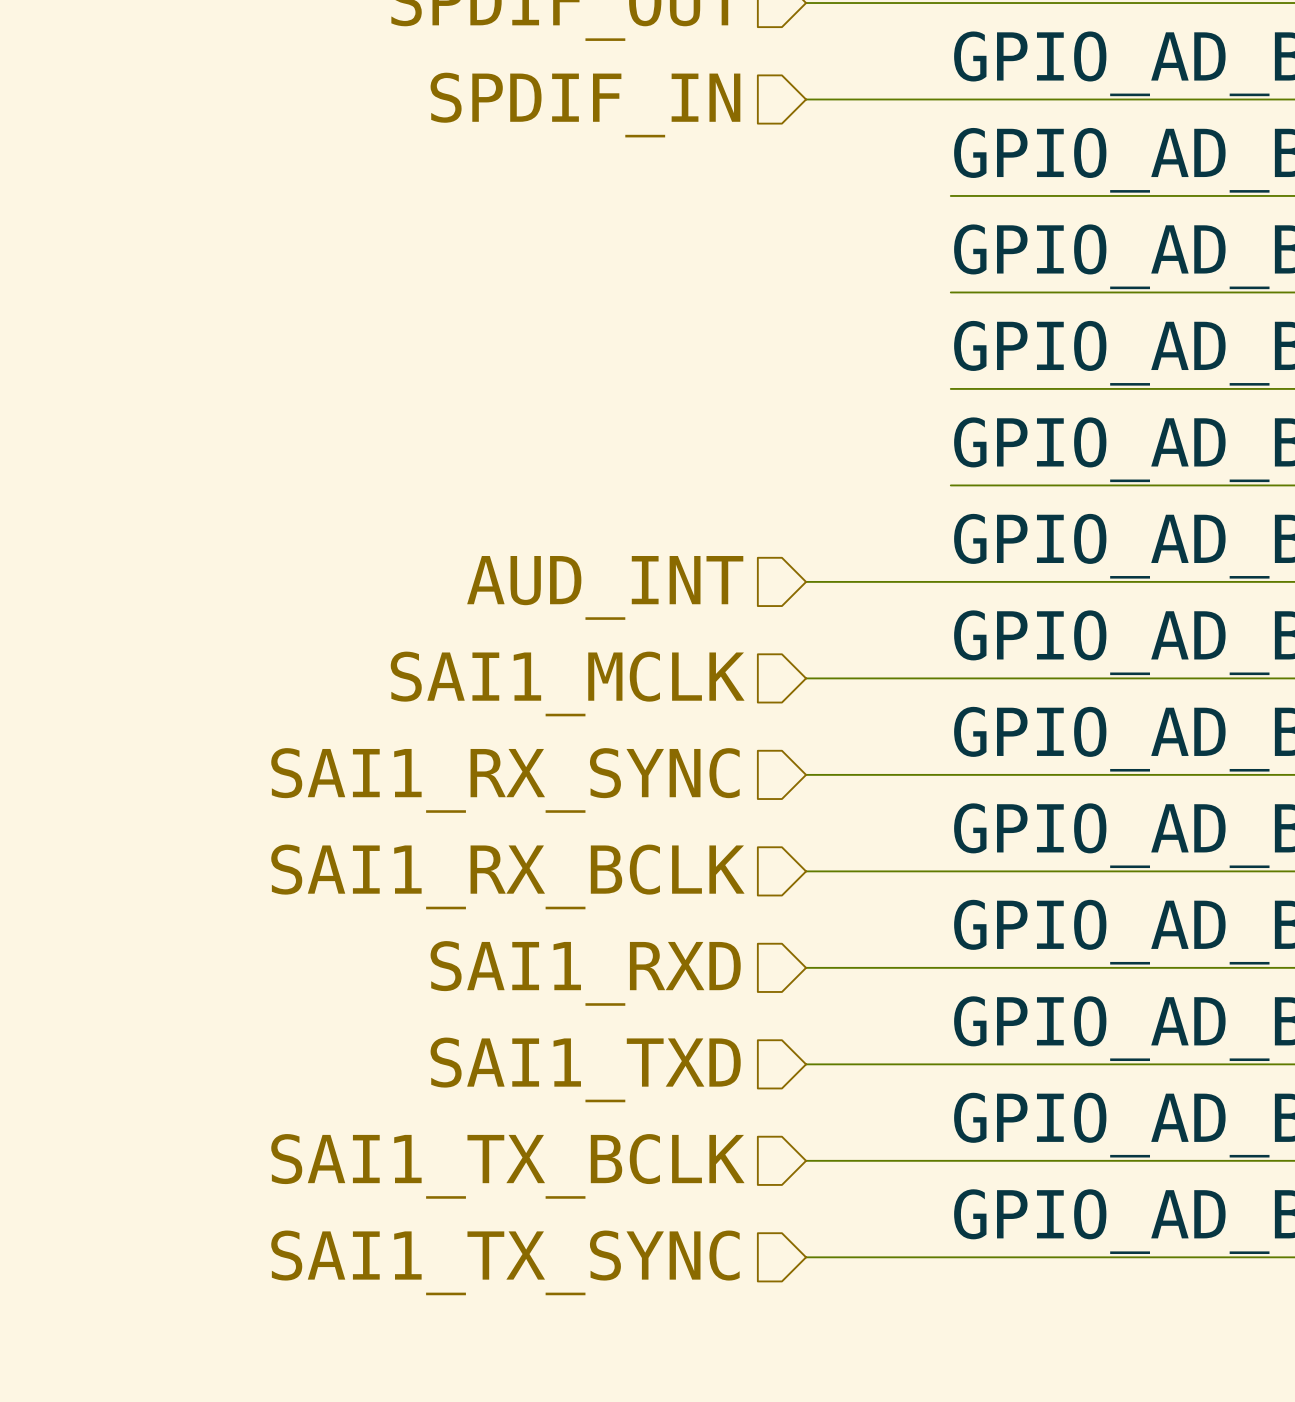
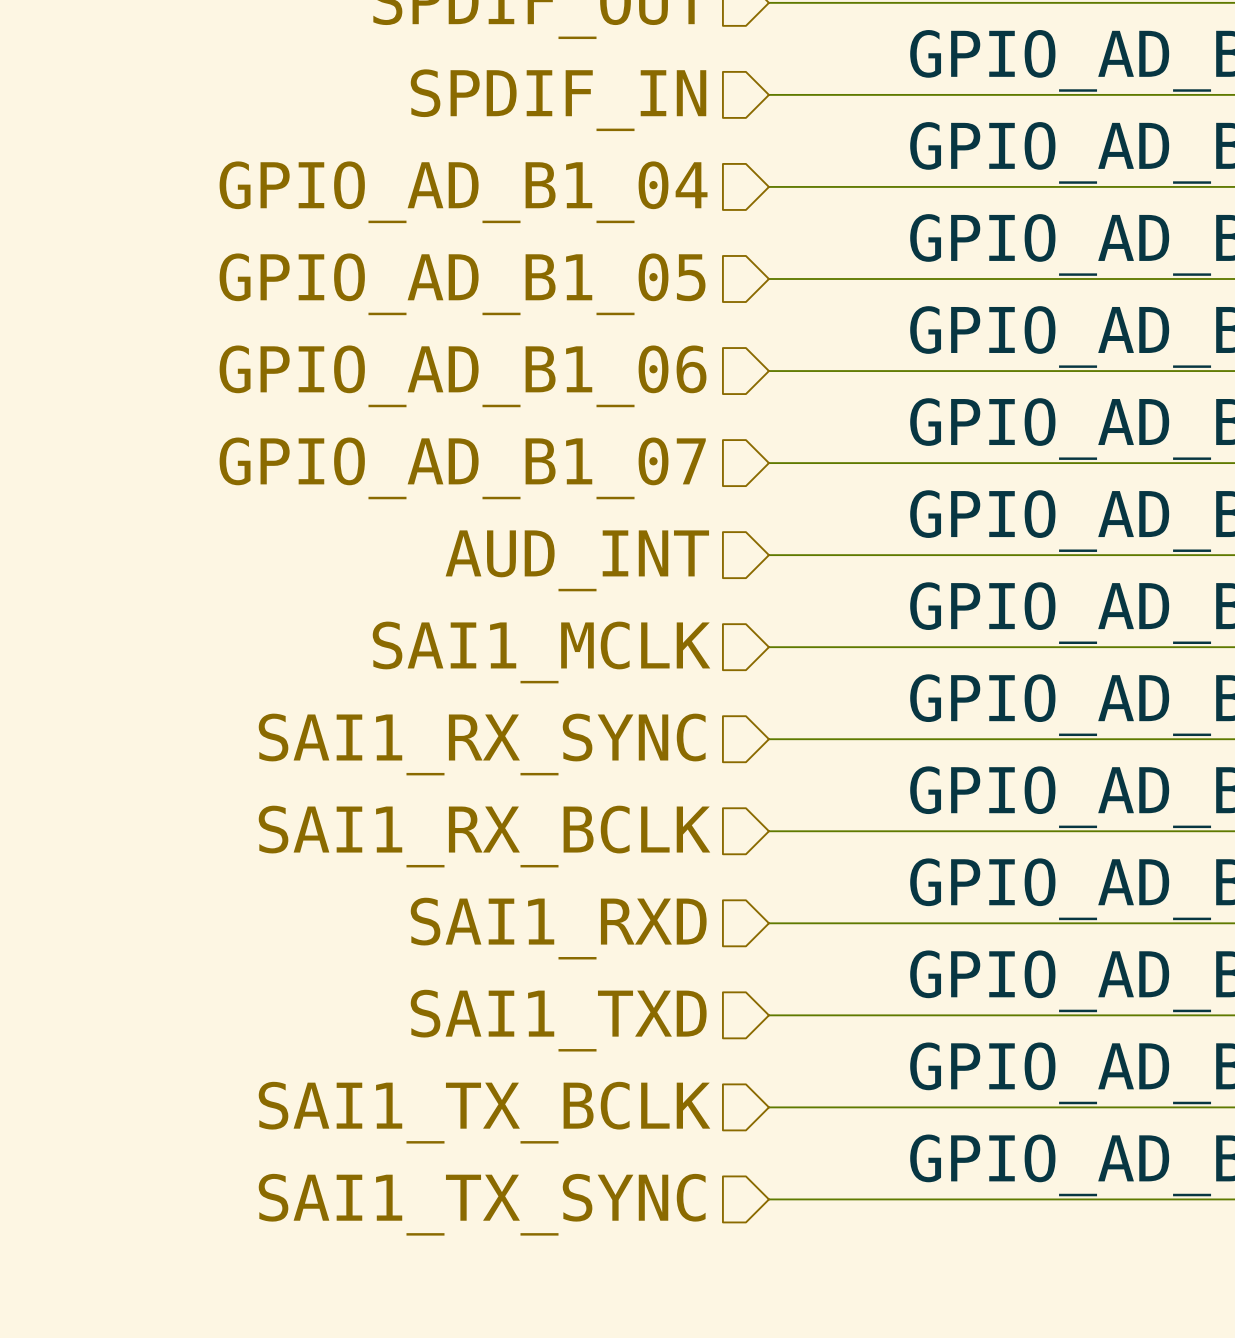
wire: none -> (768, 186) (907, 186)
hierarchical label: none -> GPIO_AD_B1_04 (463, 192)
wire: none -> (768, 279) (907, 279)
hierarchical label: none -> GPIO_AD_B1_05 (462, 284)
wire: none -> (768, 371) (907, 371)
hierarchical label: none -> GPIO_AD_B1_06 (463, 376)
wire: none -> (768, 463) (907, 463)
hierarchical label: none -> GPIO_AD_B1_07 (462, 468)

